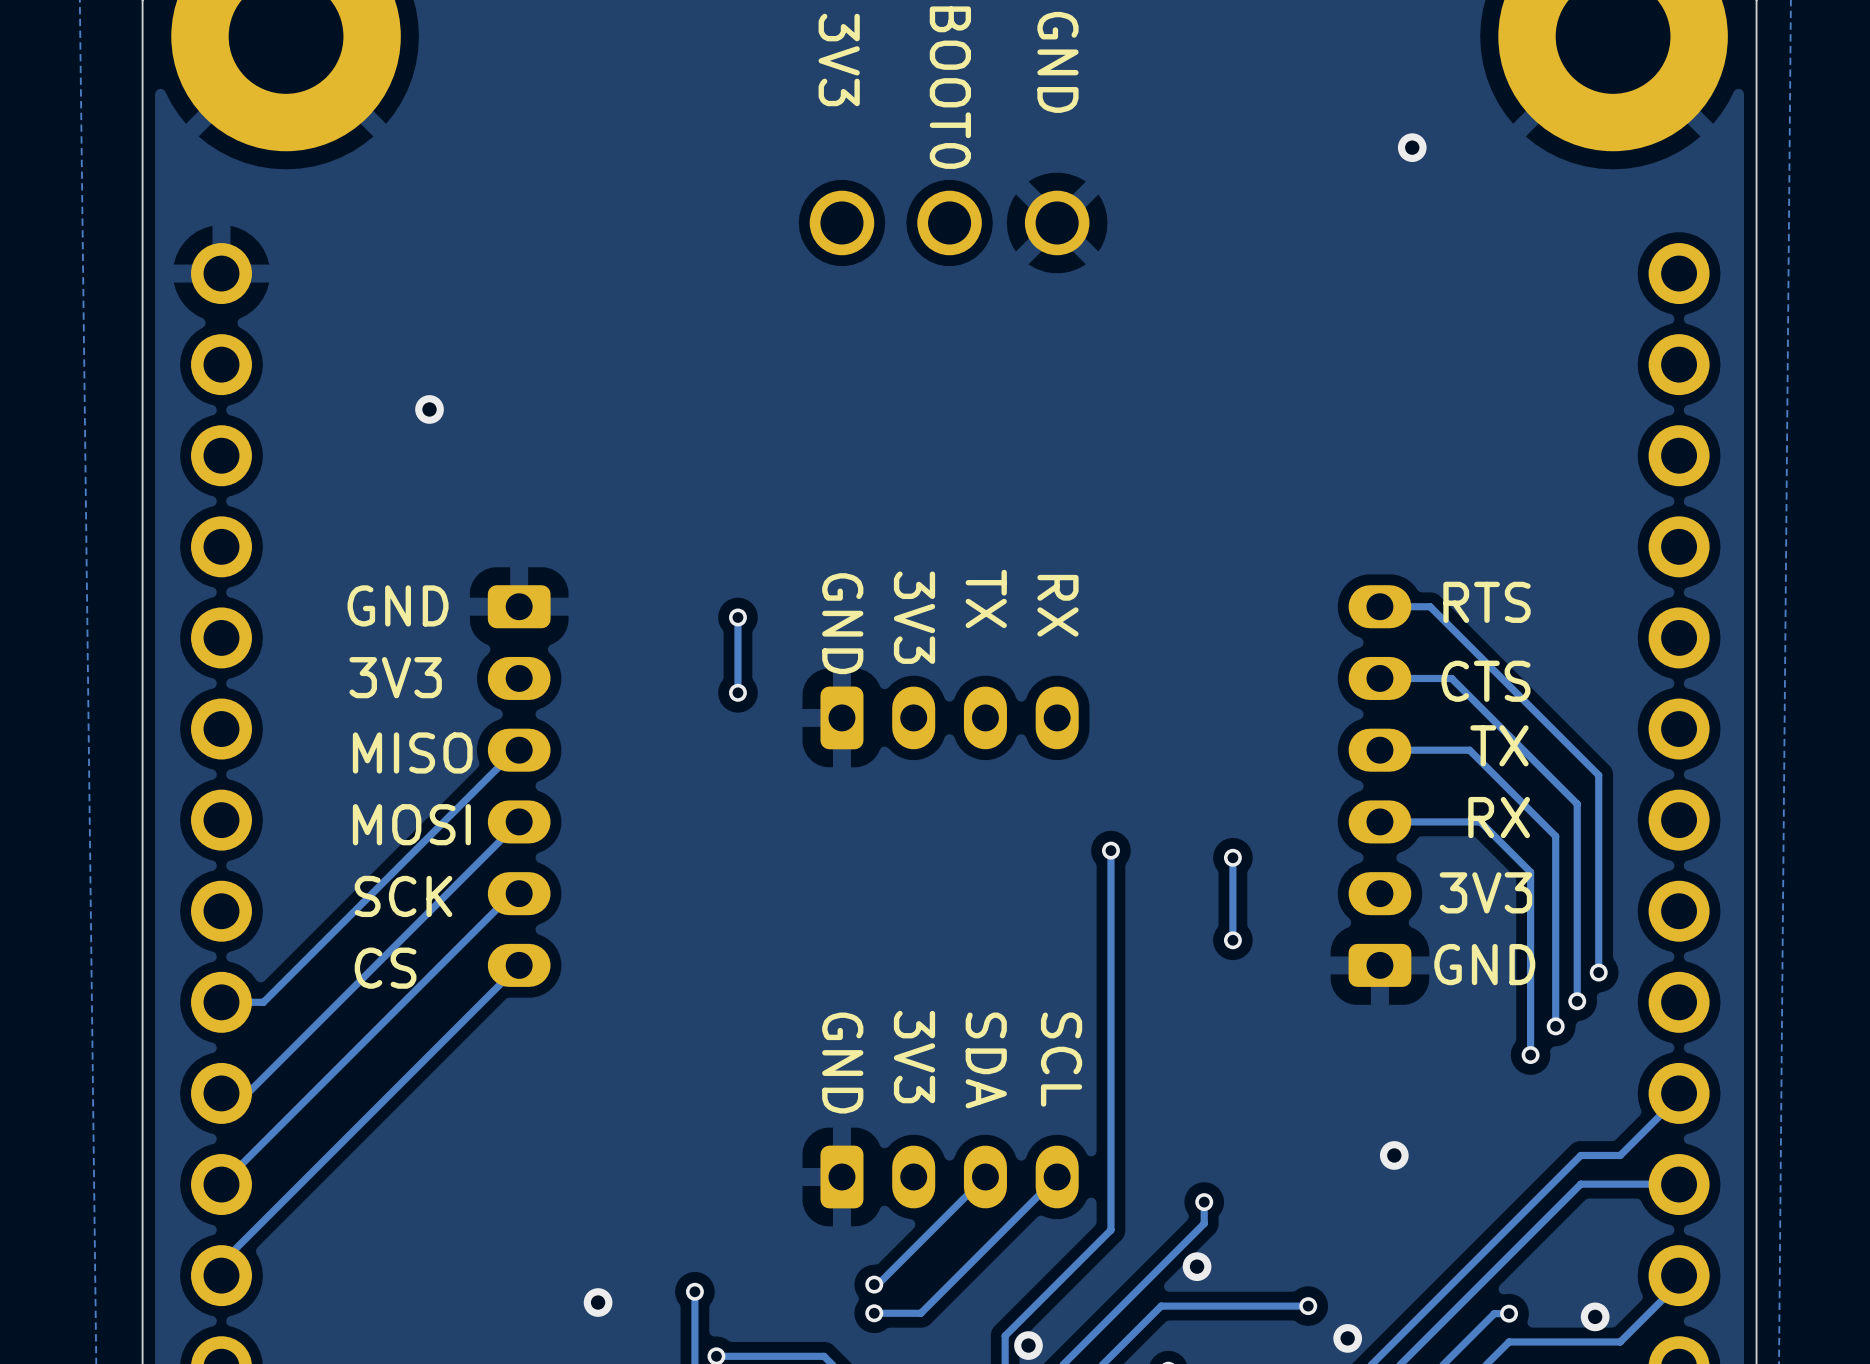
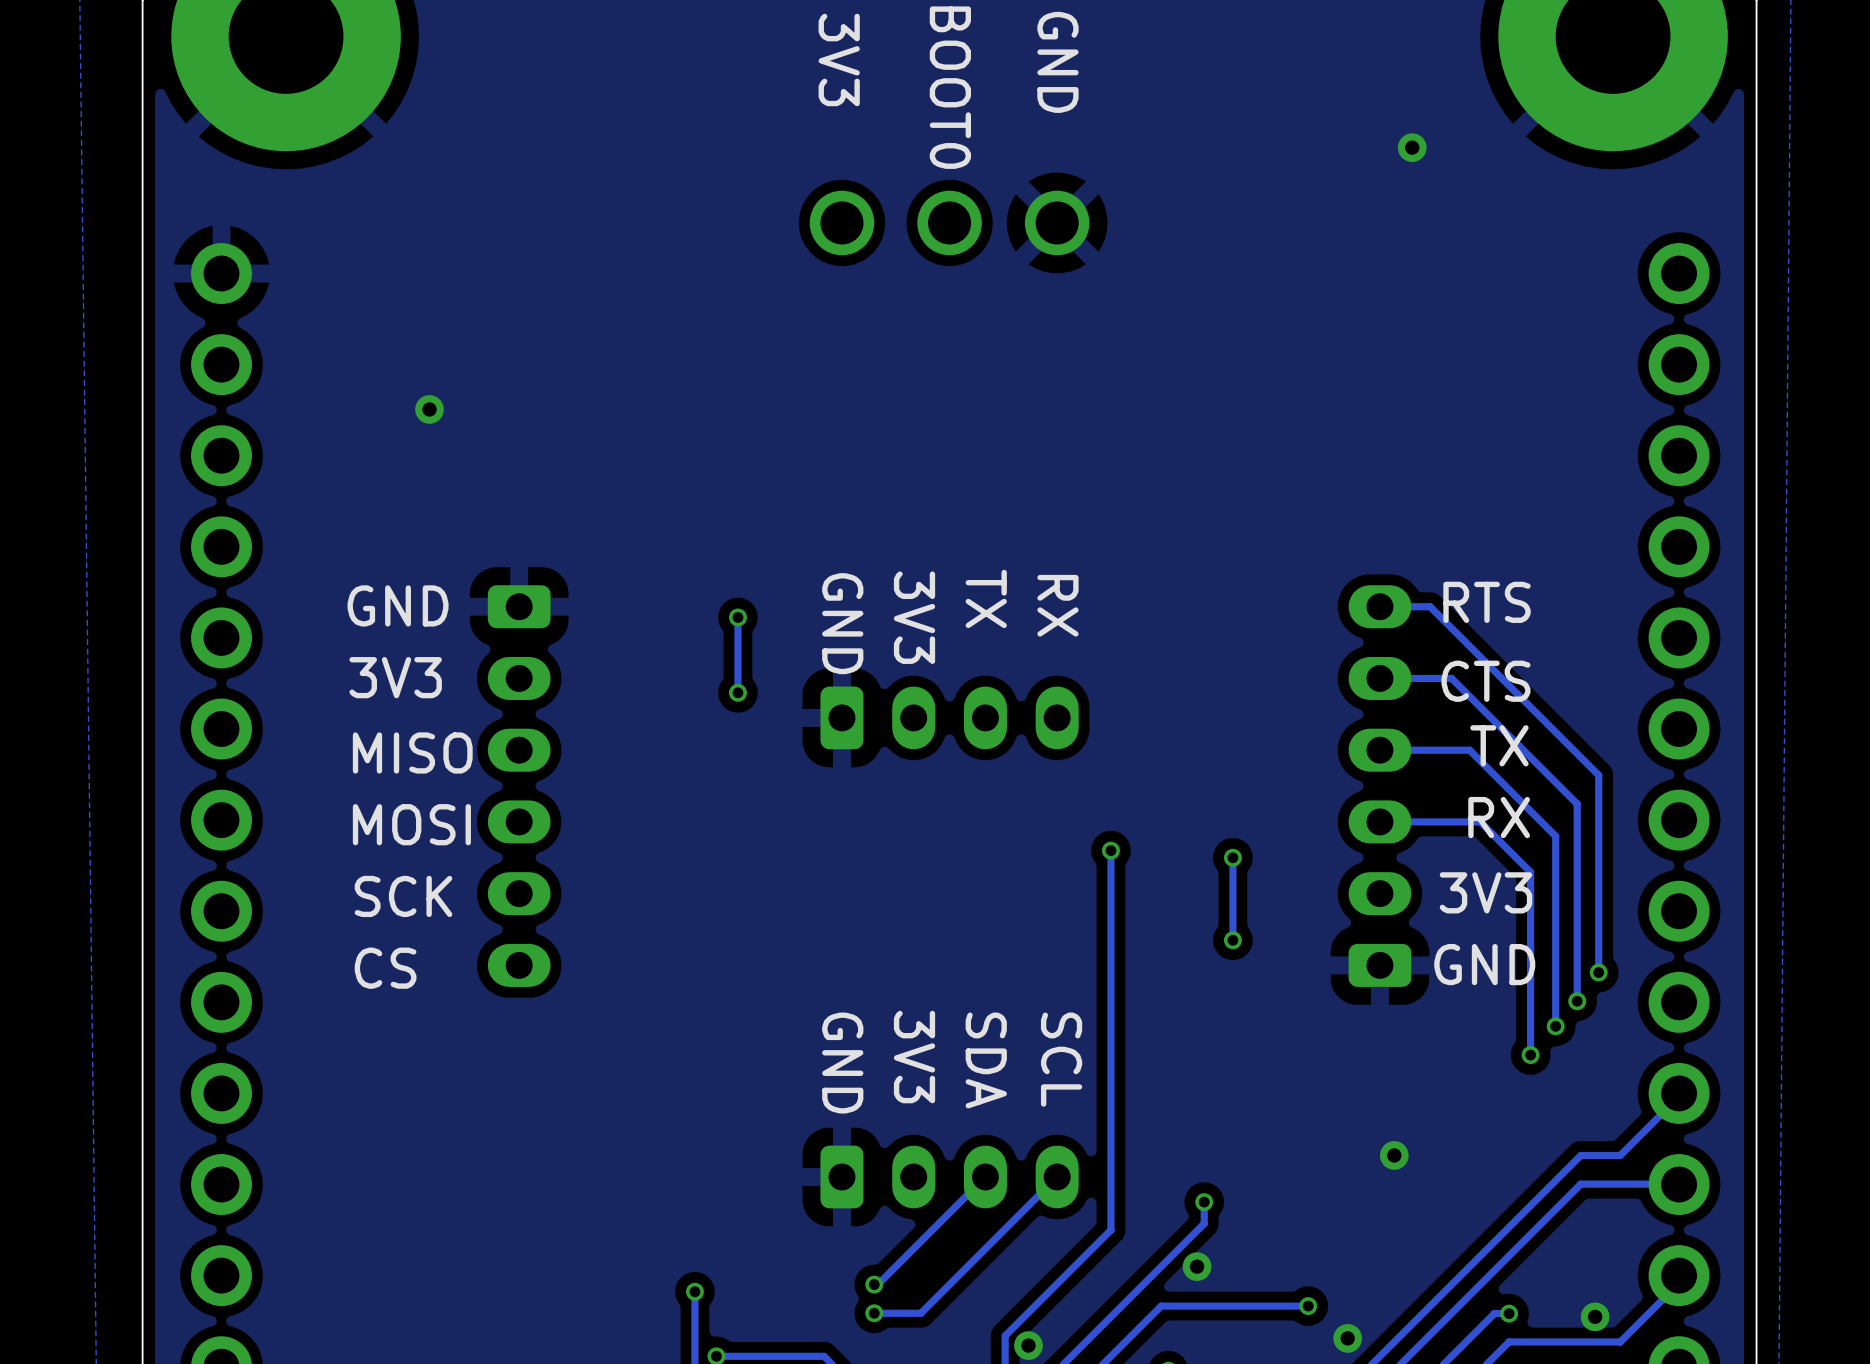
track: (519, 750) (515, 750) (263, 1002) (221, 1002) -> none
track: (519, 821) (247, 1093) (221, 1093) -> none
track: (519, 893) (512, 893) (221, 1184) -> none
track: (519, 965) (221, 1263) (221, 1275) -> none
via: (598, 1302) -> none

